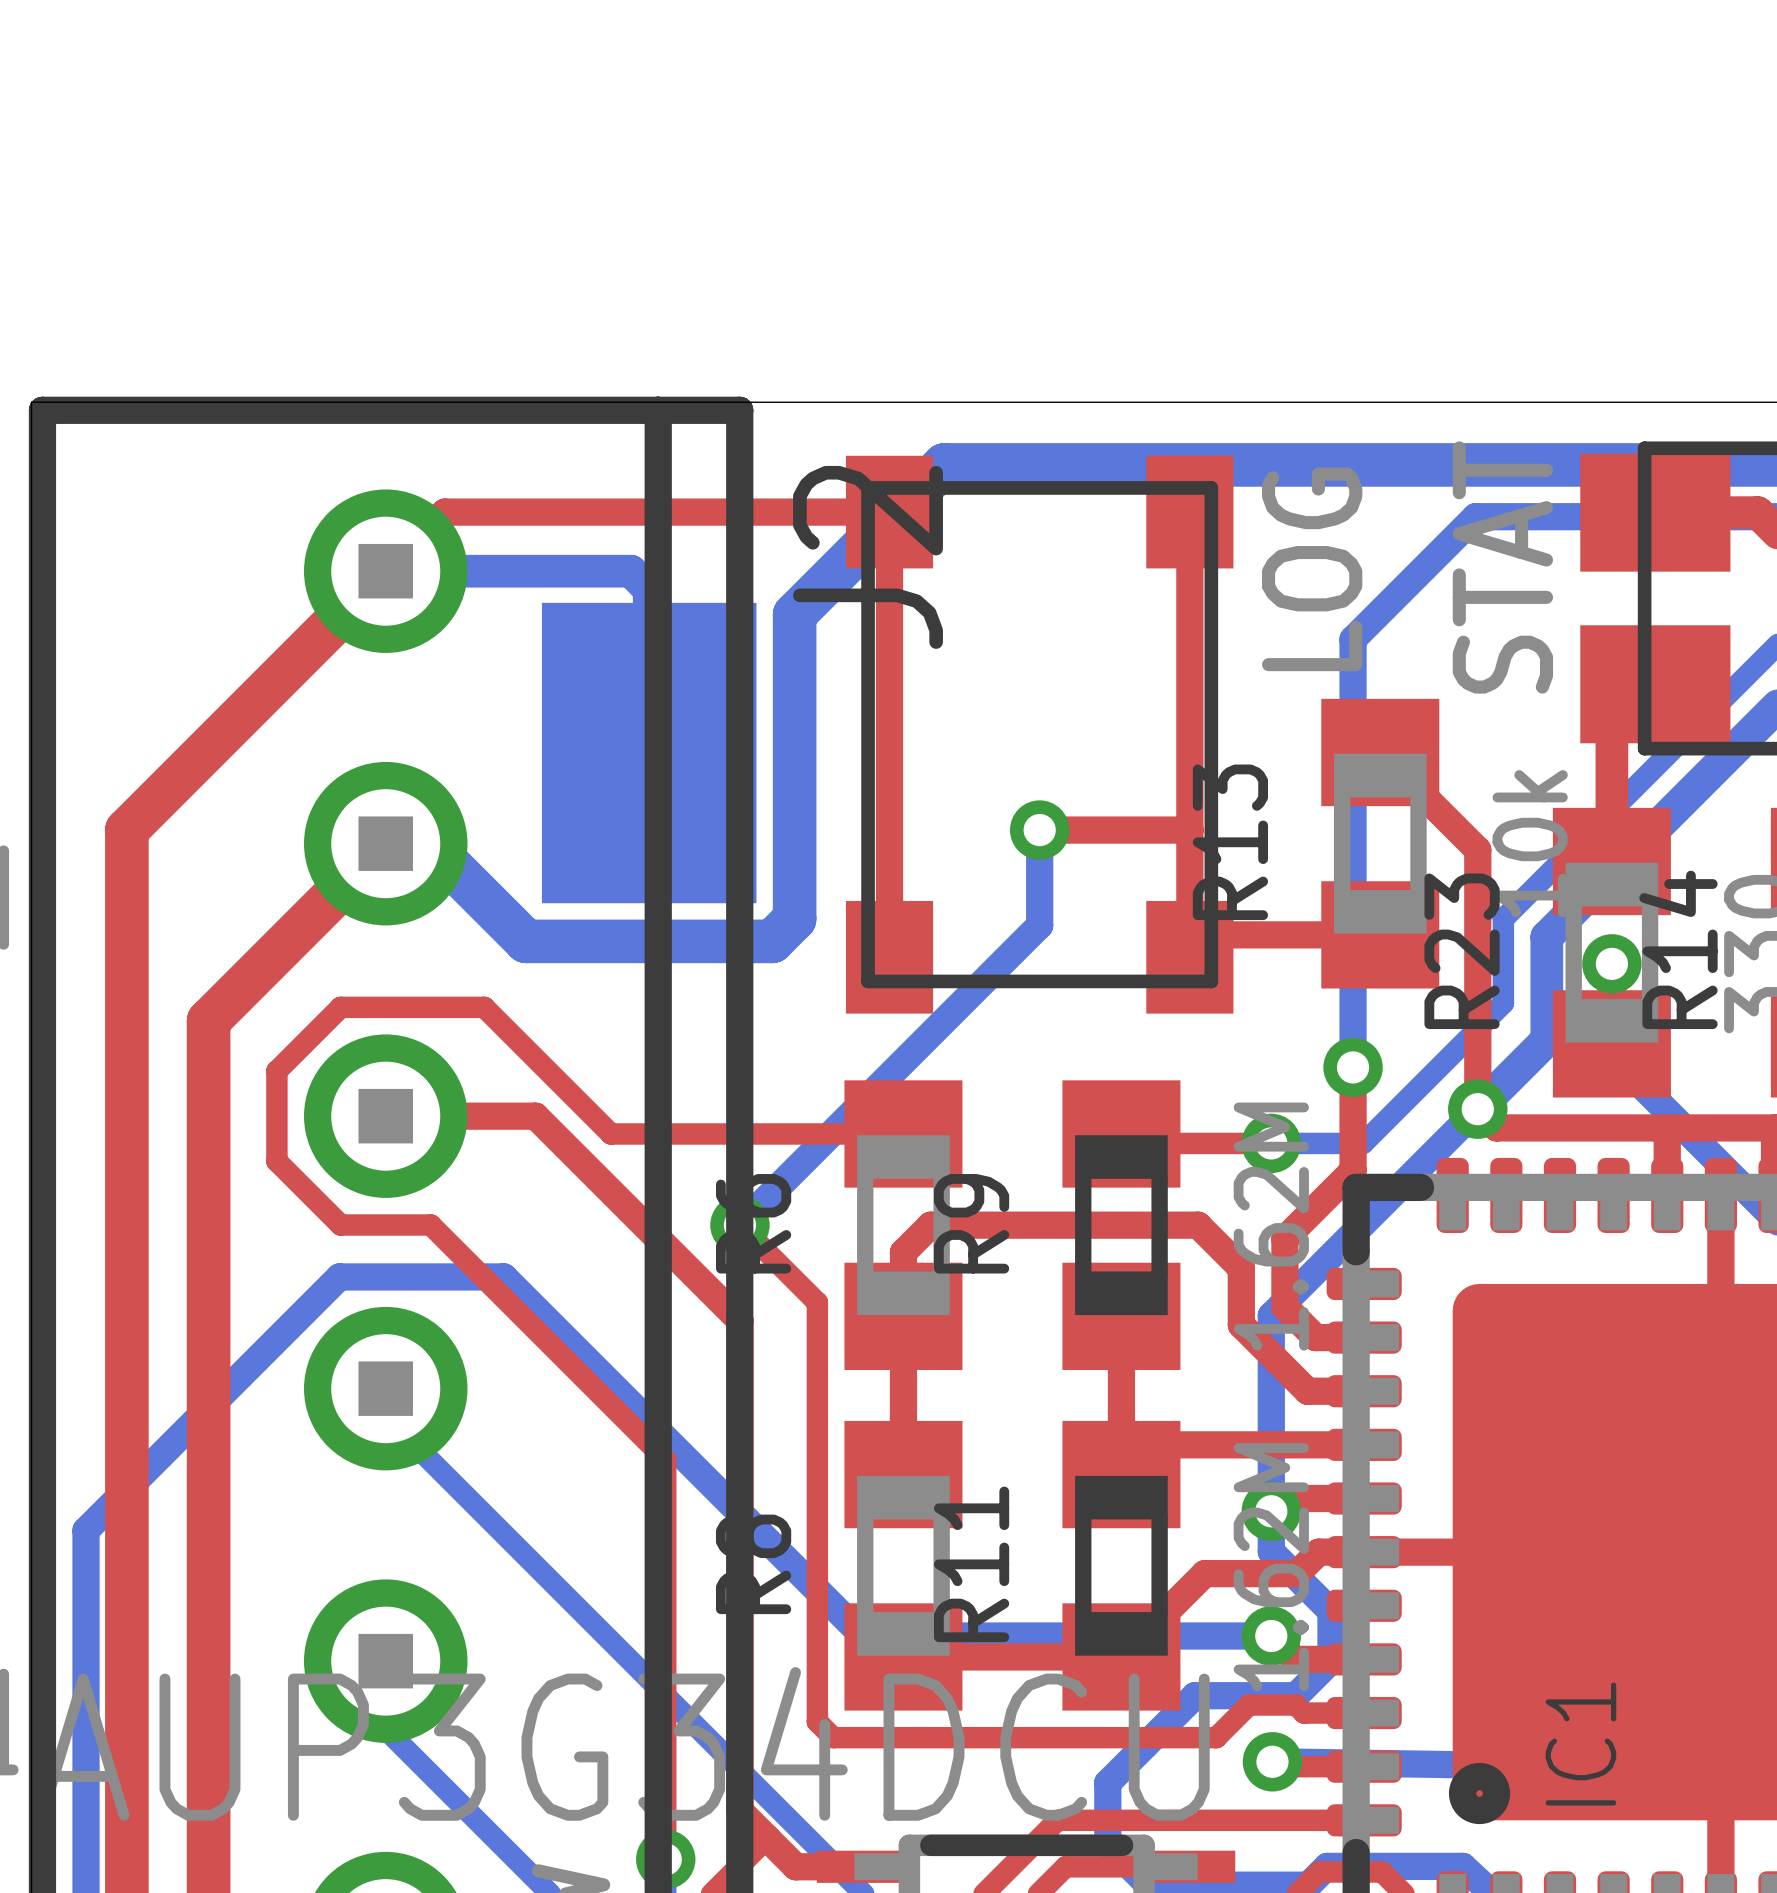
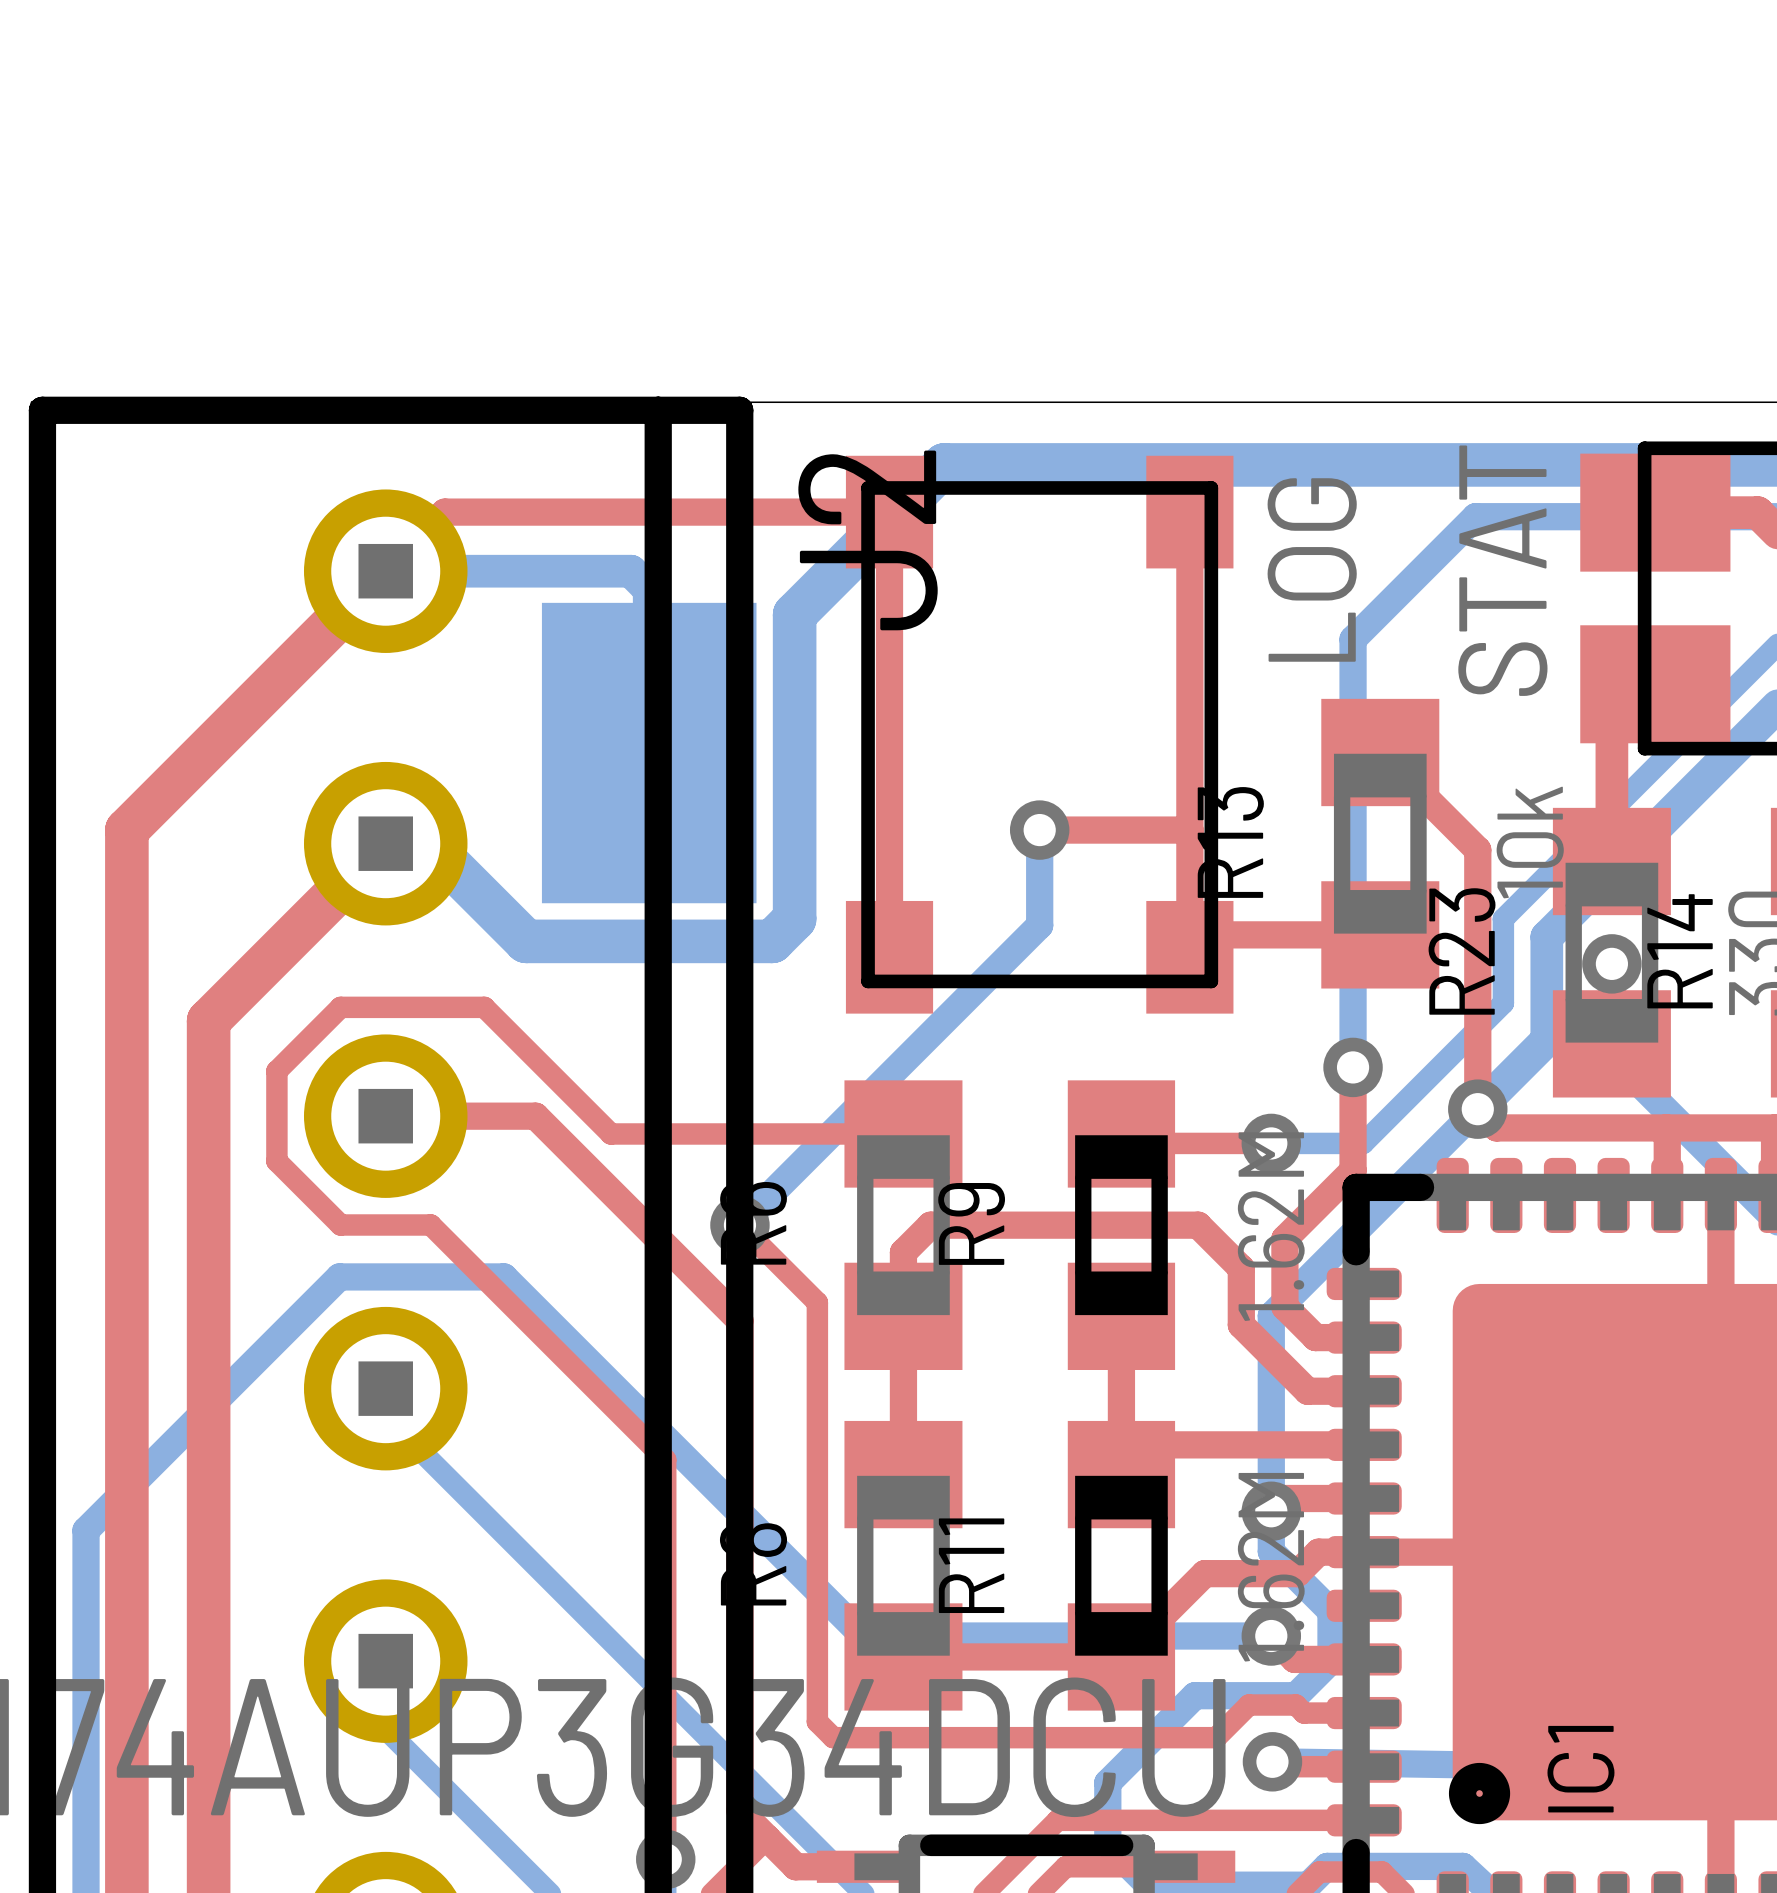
R9 footprint: [1062, 1080, 1181, 1370] -> [1067, 1080, 1176, 1370]
R11 footprint: [1062, 1420, 1181, 1711] -> [1067, 1420, 1176, 1711]

